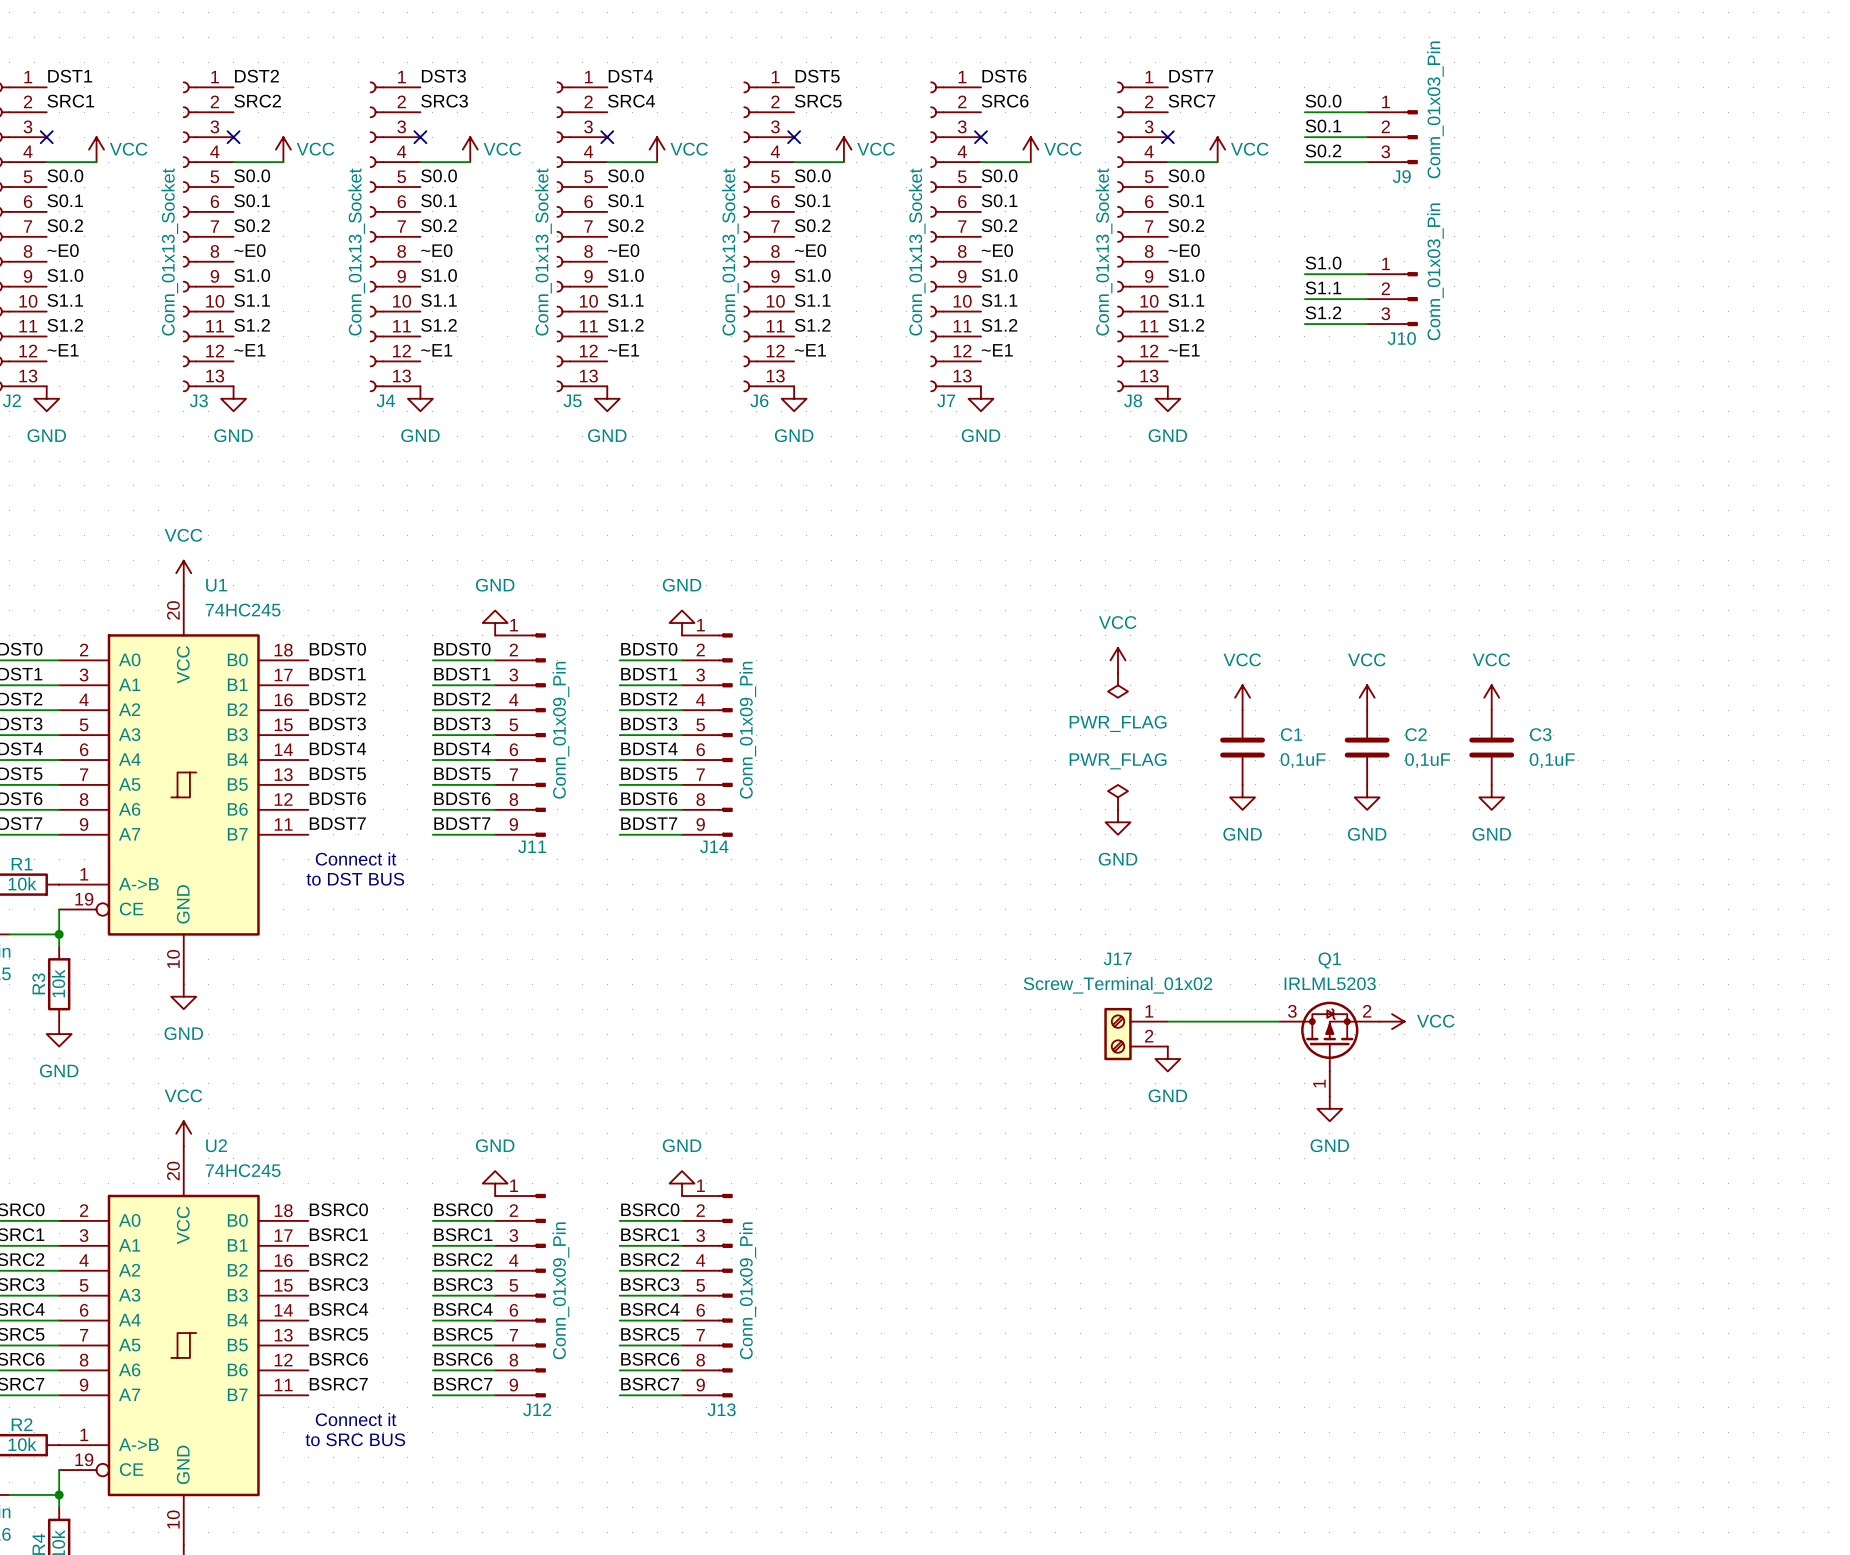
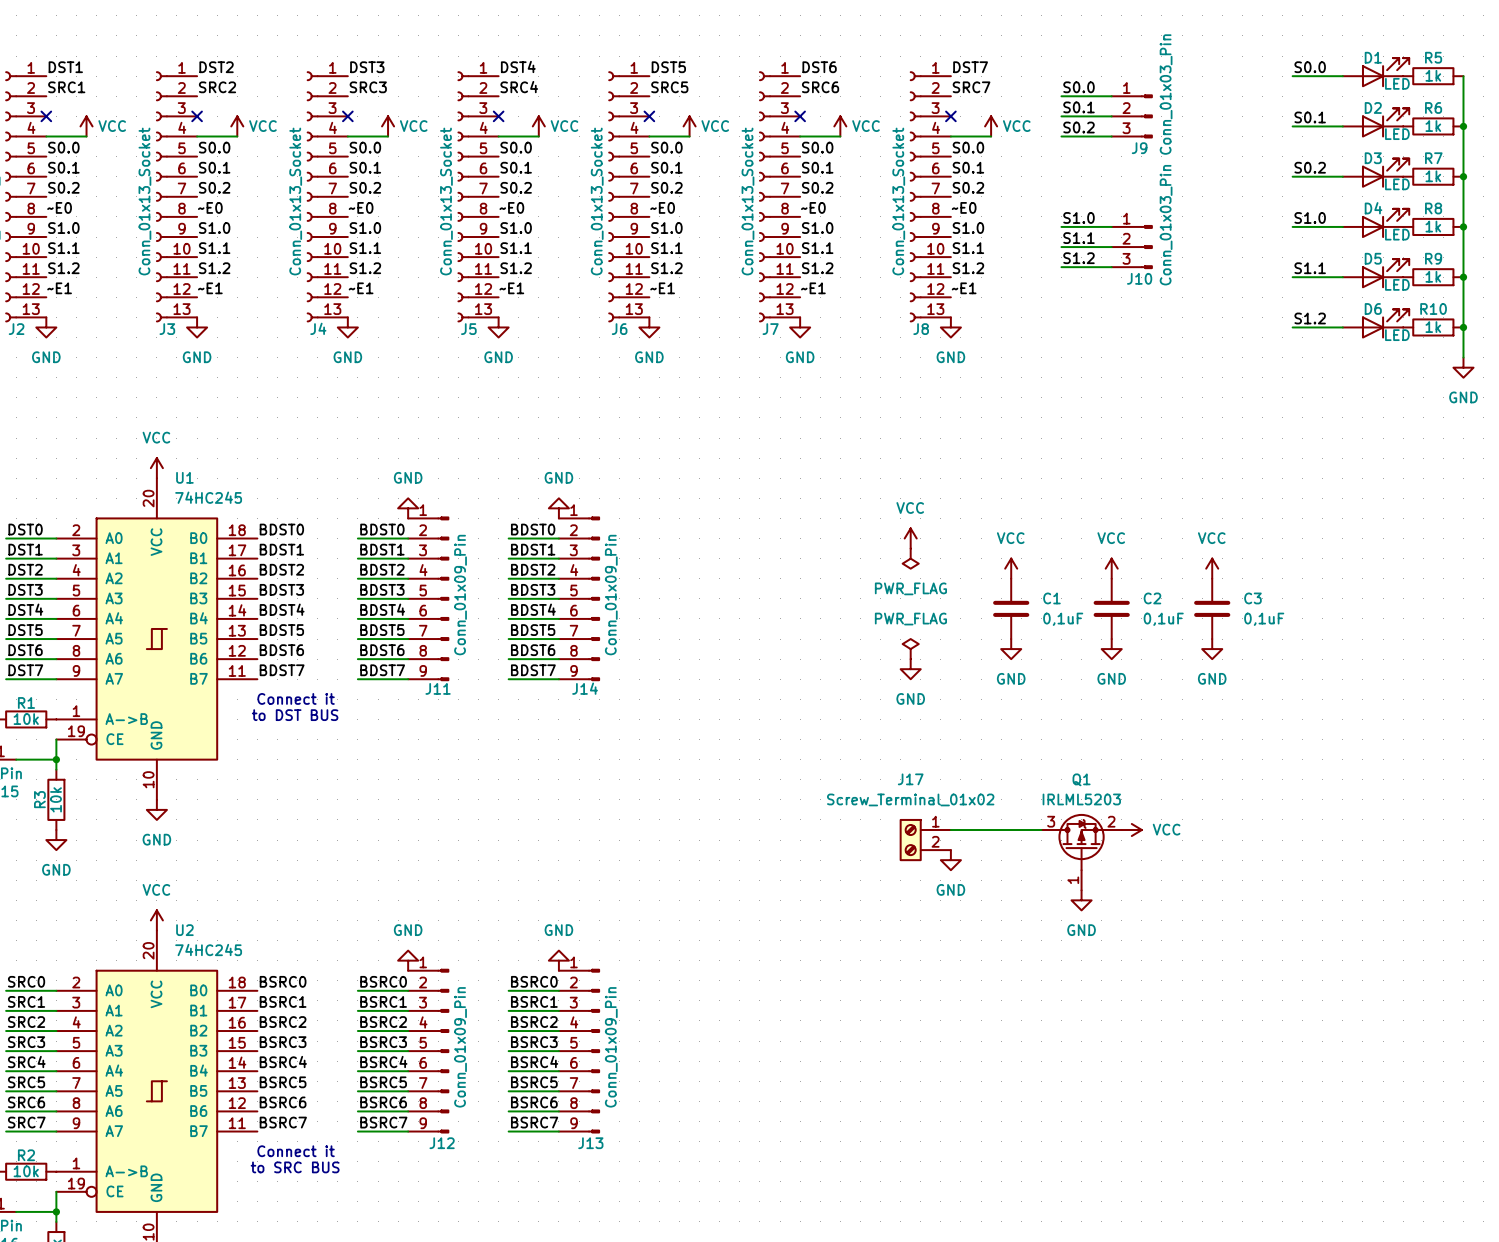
label: none -> S0.0 (1310, 67)
D1: none -> LED (1376, 72)
wire: none -> (1292, 76) (1342, 76)
R5: none -> 1k (1433, 76)
wire: none -> (1463, 76) (1463, 357)
label: none -> S0.1 (1310, 117)
D2: none -> LED (1376, 122)
wire: none -> (1292, 126) (1342, 126)
R6: none -> 1k (1433, 126)
junction: none -> (1463, 126)
label: none -> S0.2 (1310, 167)
D3: none -> LED (1376, 173)
wire: none -> (1292, 176) (1342, 176)
R7: none -> 1k (1433, 176)
junction: none -> (1463, 176)
label: none -> S1.0 (1310, 217)
D4: none -> LED (1376, 223)
wire: none -> (1292, 226) (1342, 226)
R8: none -> 1k (1433, 226)
junction: none -> (1463, 226)
label: none -> S1.1 (1310, 268)
D5: none -> LED (1376, 273)
wire: none -> (1292, 277) (1342, 277)
R9: none -> 1k (1433, 277)
junction: none -> (1463, 277)
label: none -> S1.2 (1310, 318)
D6: none -> LED (1376, 323)
wire: none -> (1292, 327) (1342, 327)
R10: none -> 1k (1433, 327)
junction: none -> (1463, 327)
power symbol: none -> GND (1463, 367)

